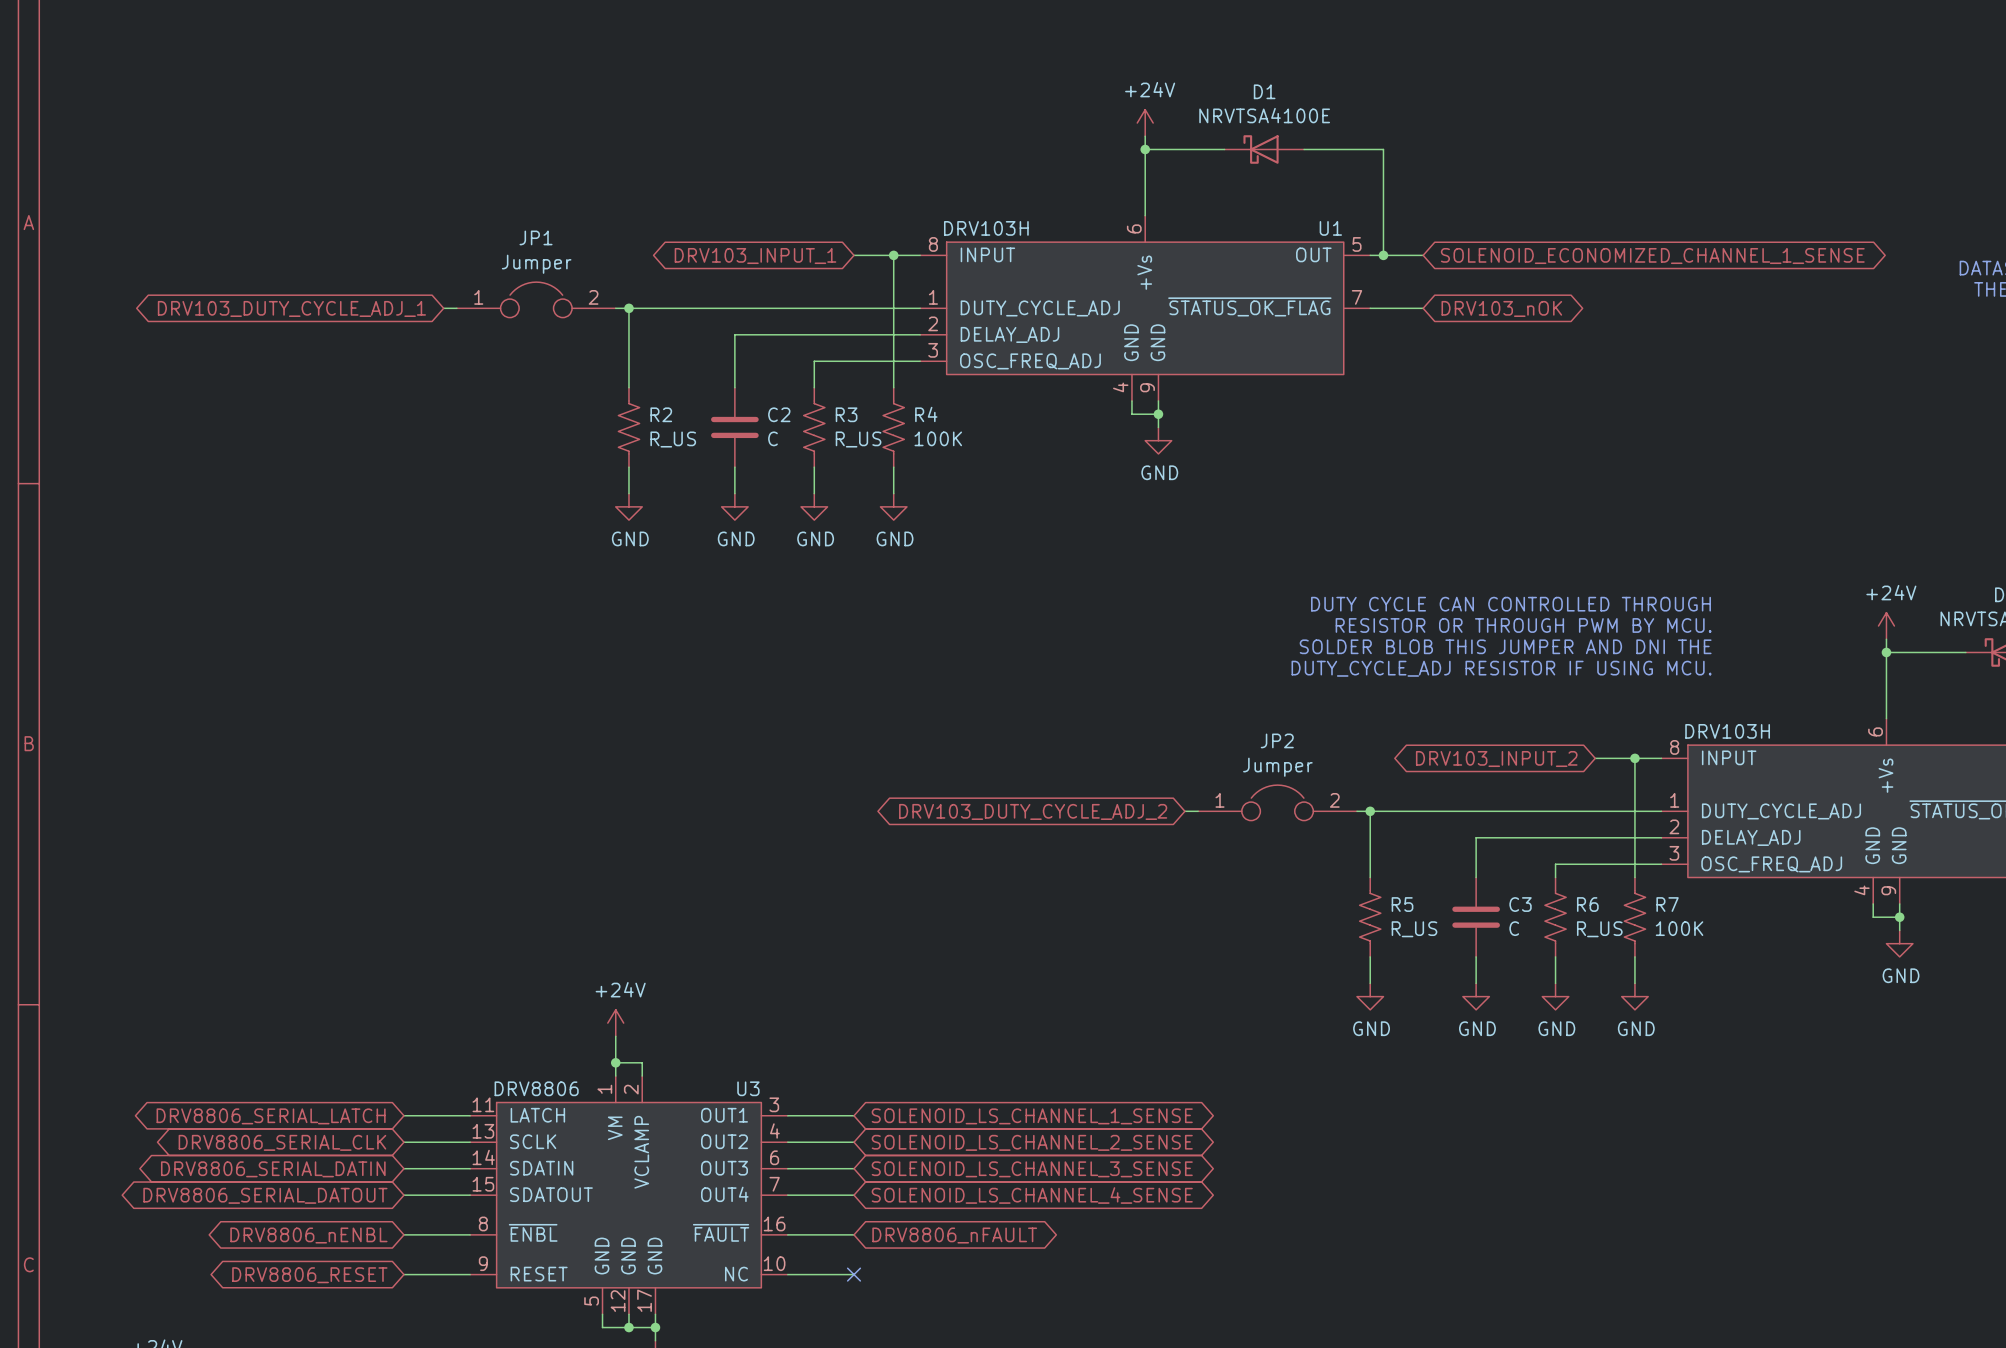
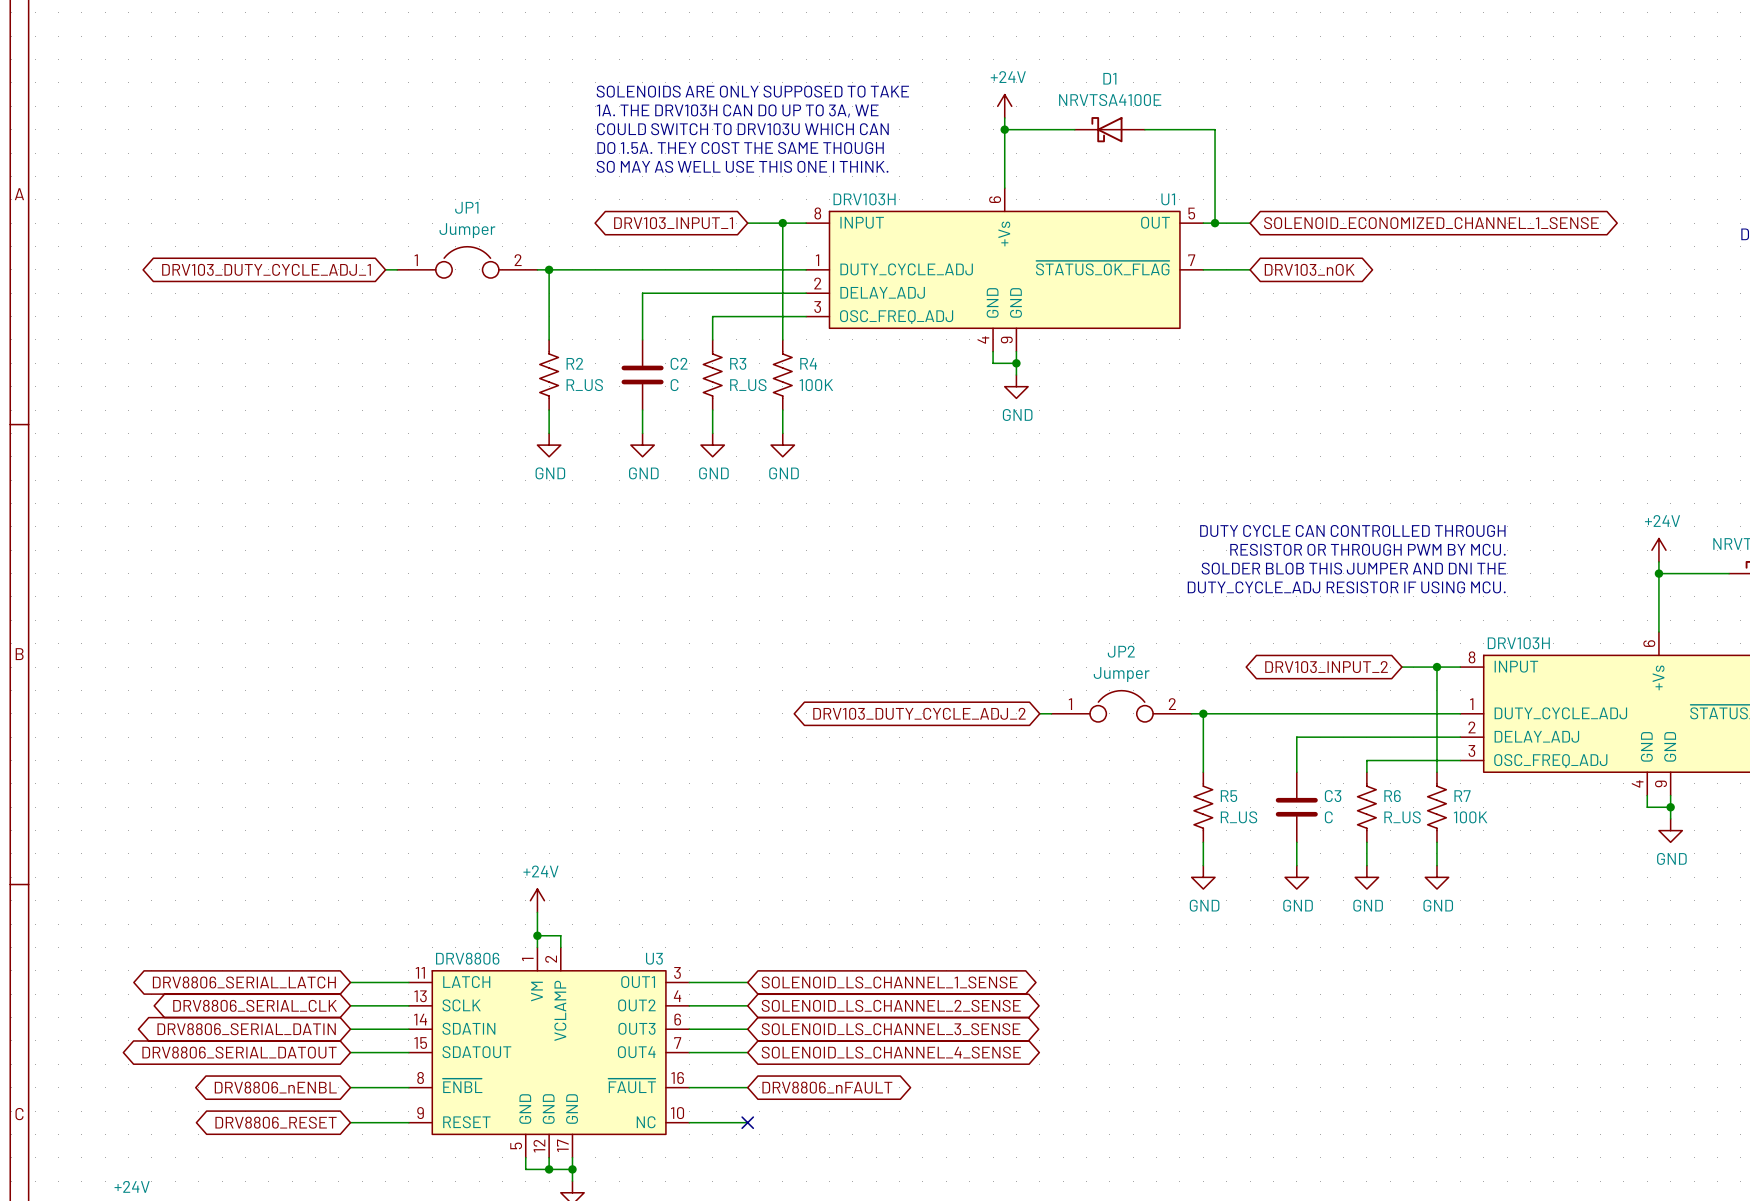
text: none -> SOLENOIDS ARE ONLY SUPPOSED TO TAKE (752, 91)
text: none -> 1A. THE DRV103H CAN DO UP TO 3A, WE (737, 110)
text: none -> COULD SWITCH TO DRV103U WHICH CAN (742, 129)
text: none -> DO 1.5A. THEY COST THE SAME THOUGH (740, 148)
text: none -> SO MAY AS WELL USE THIS ONE I THINK. (742, 166)

